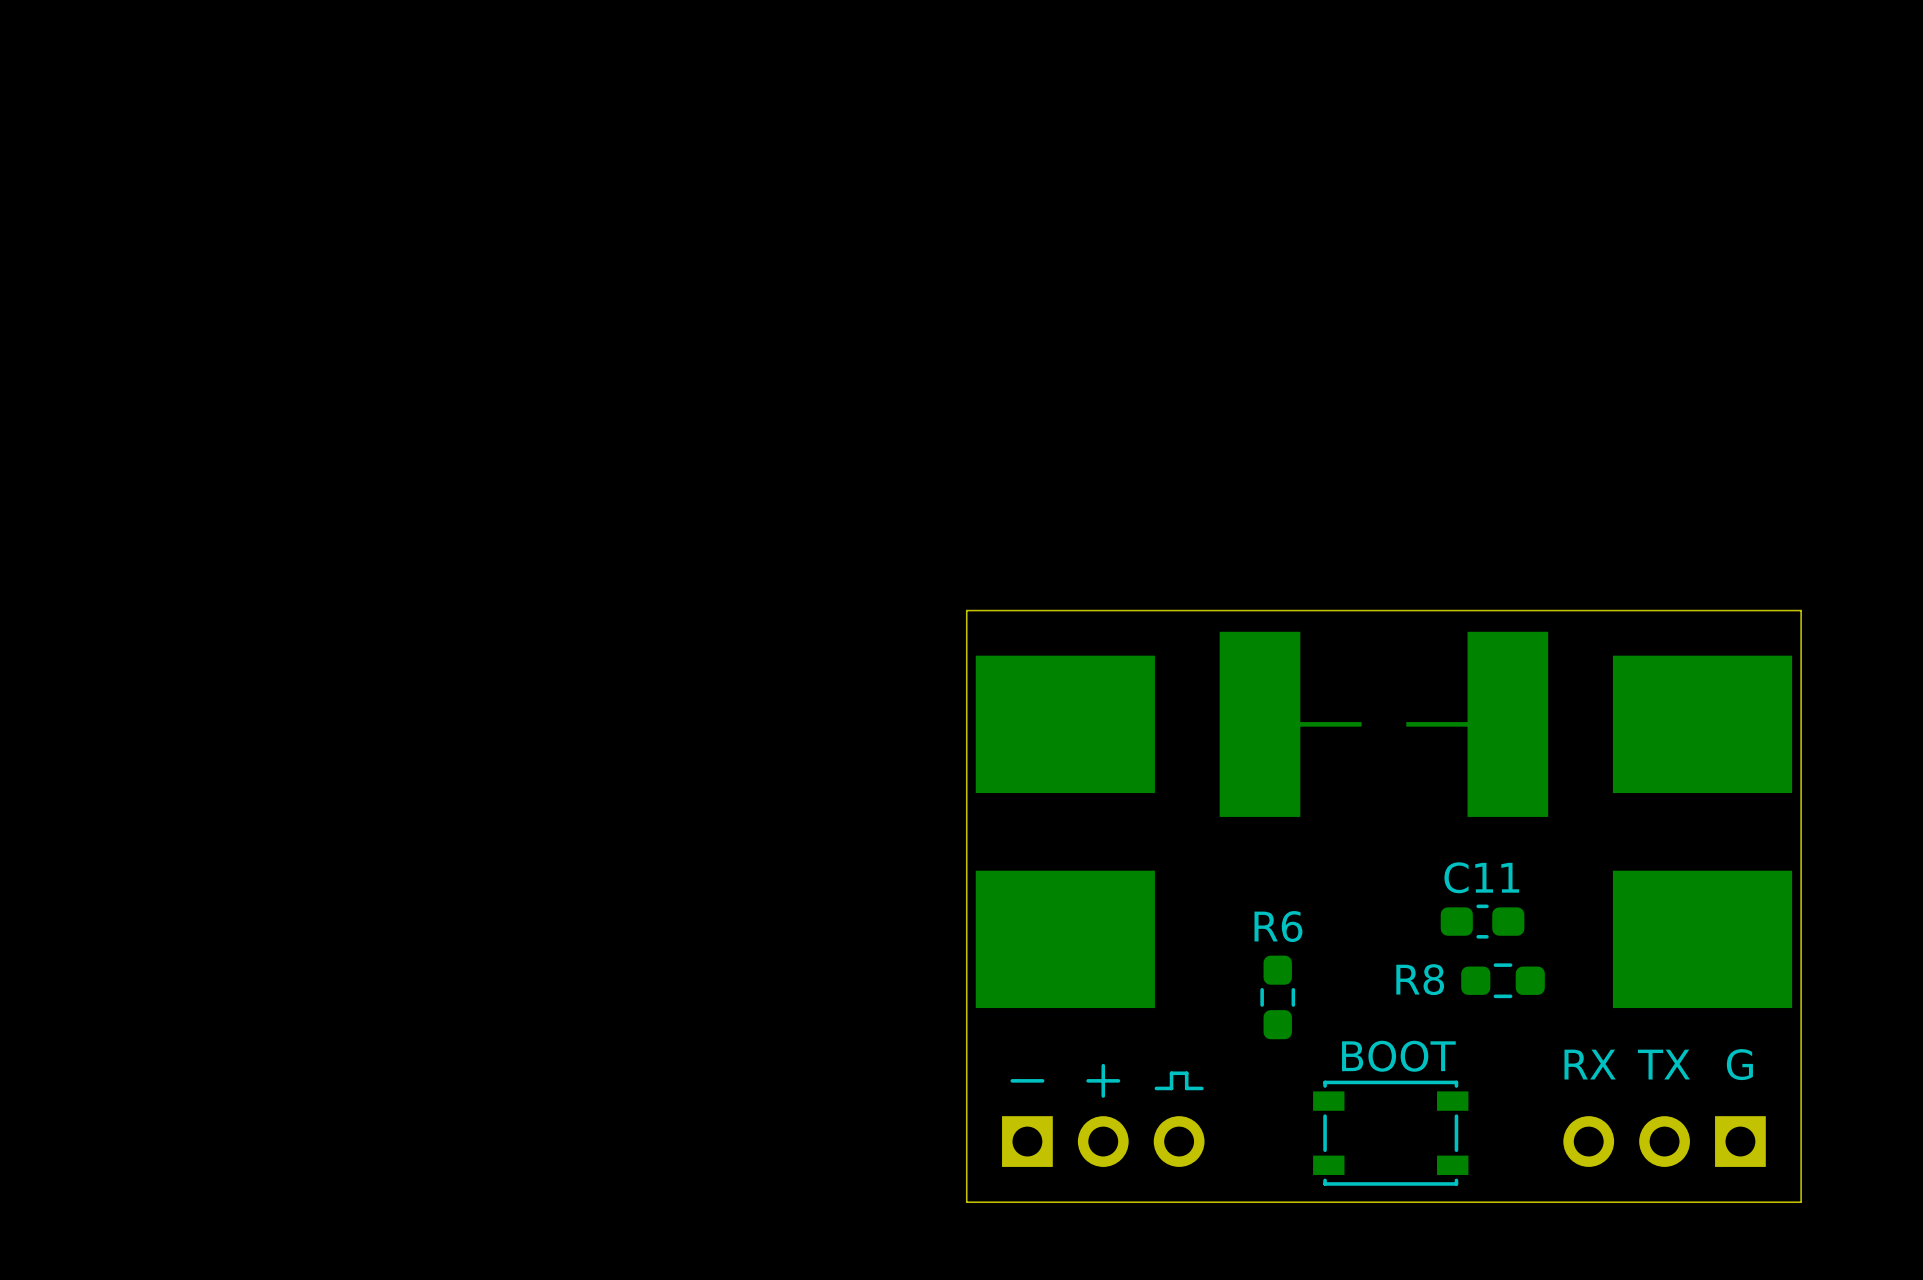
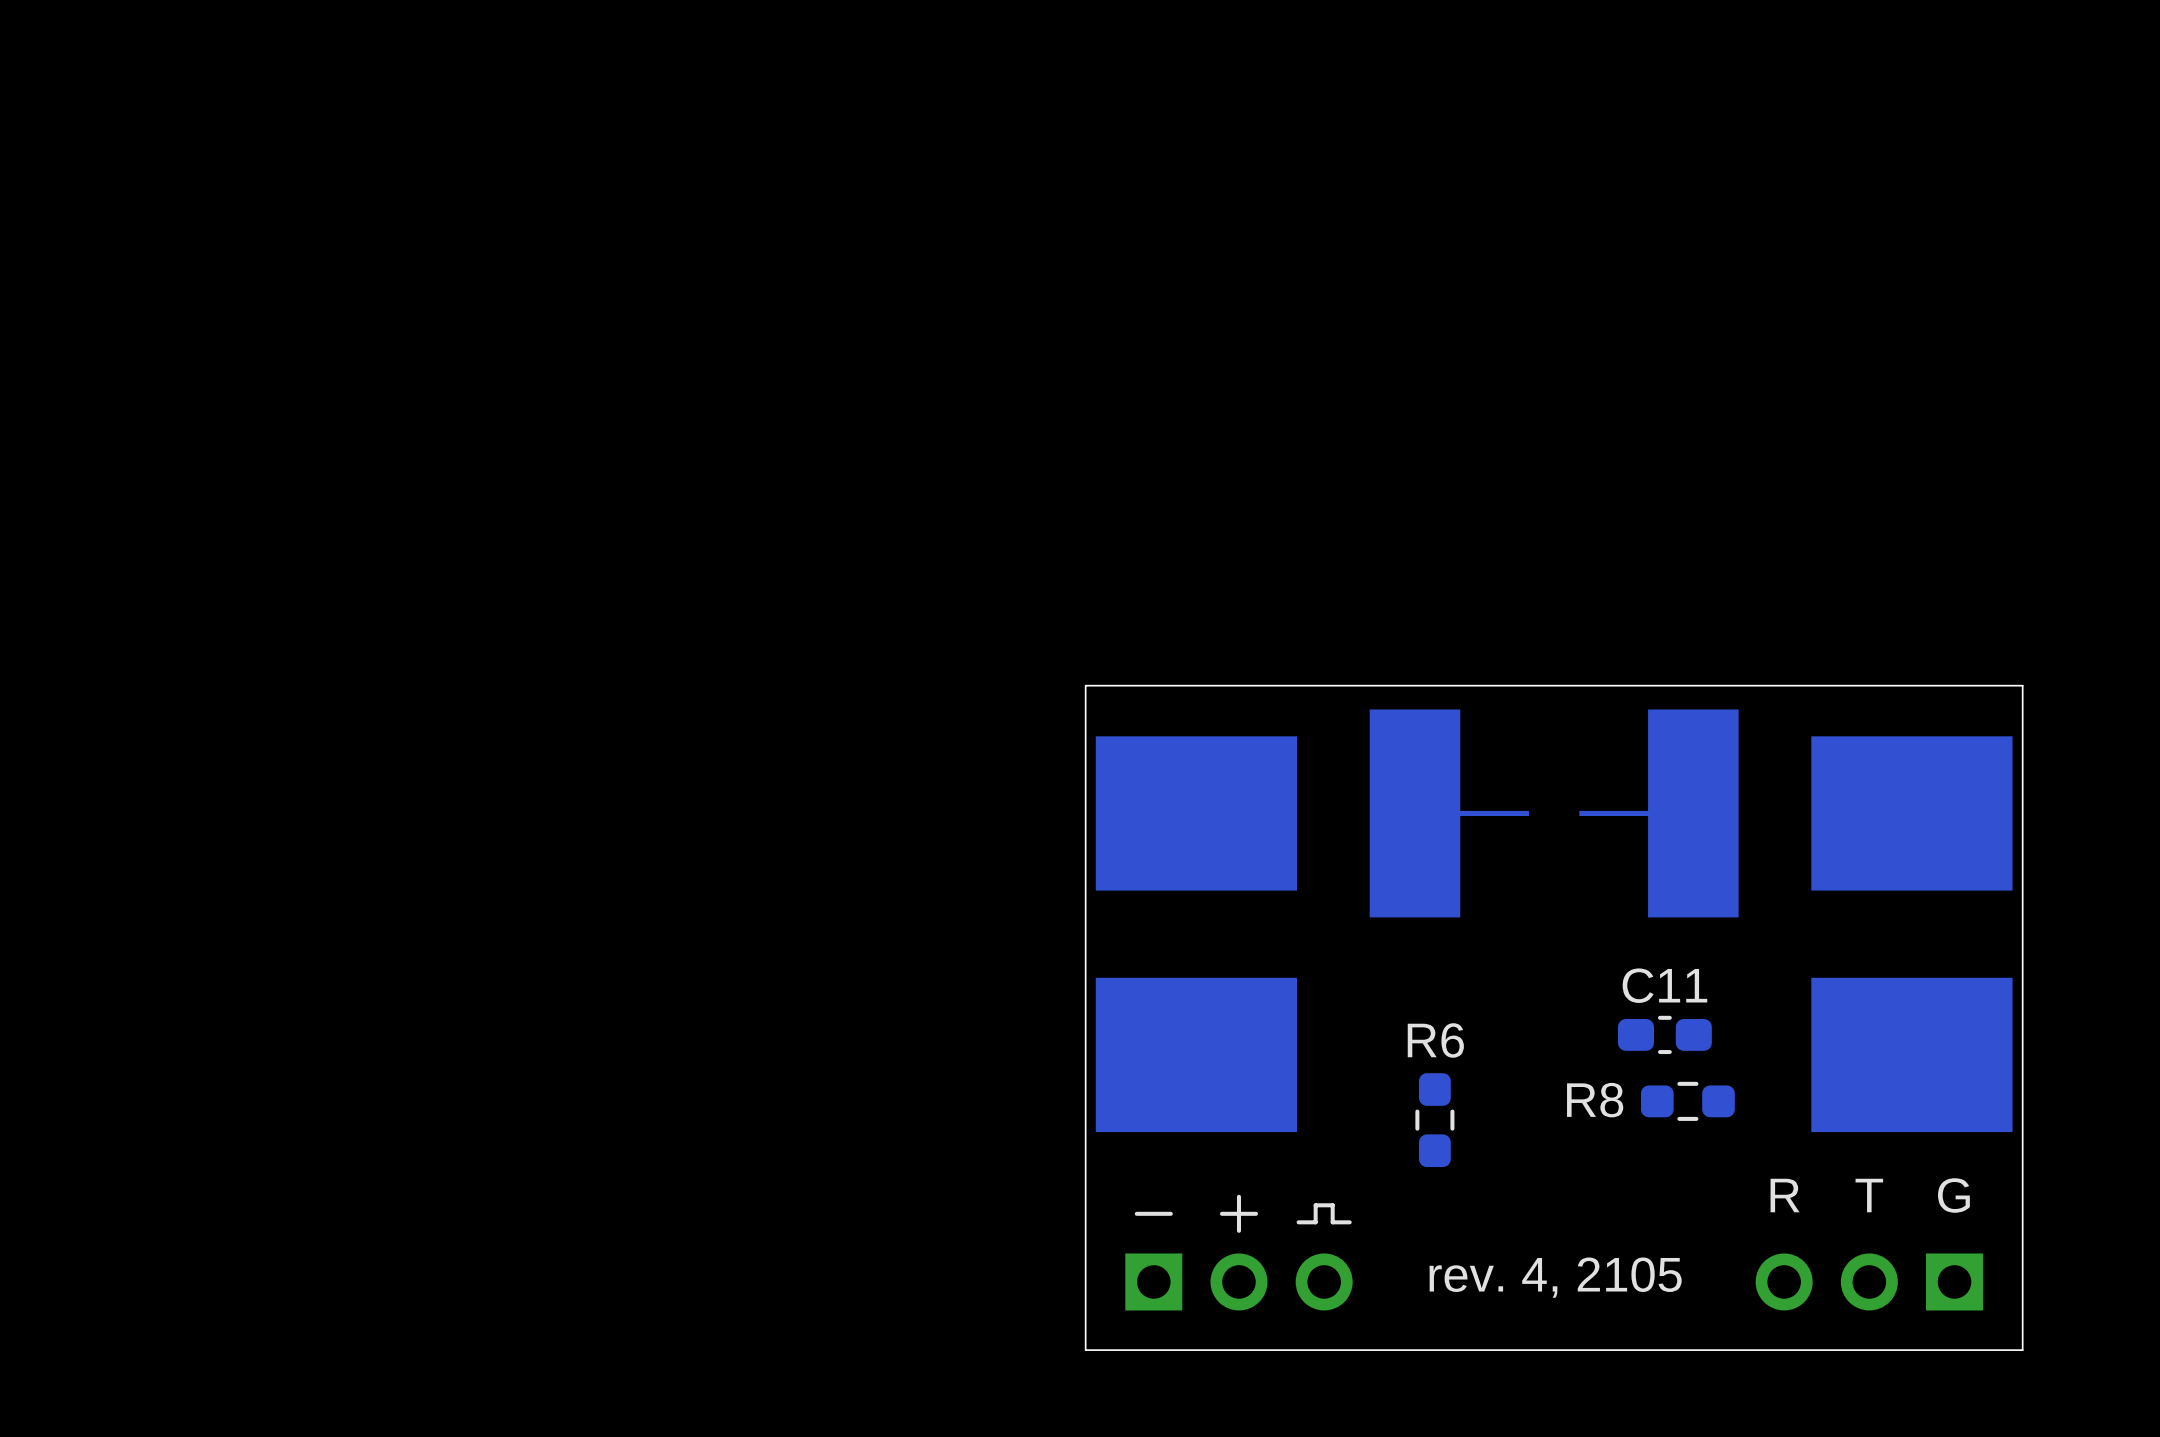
text: BOOT (1398, 1056) -> none
text: RX (1590, 1064) -> R (1785, 1195)
text: TX (1663, 1064) -> T (1869, 1195)
part: (1390, 1133) -> none
text: none -> rev. 4, 2105 (1555, 1277)

